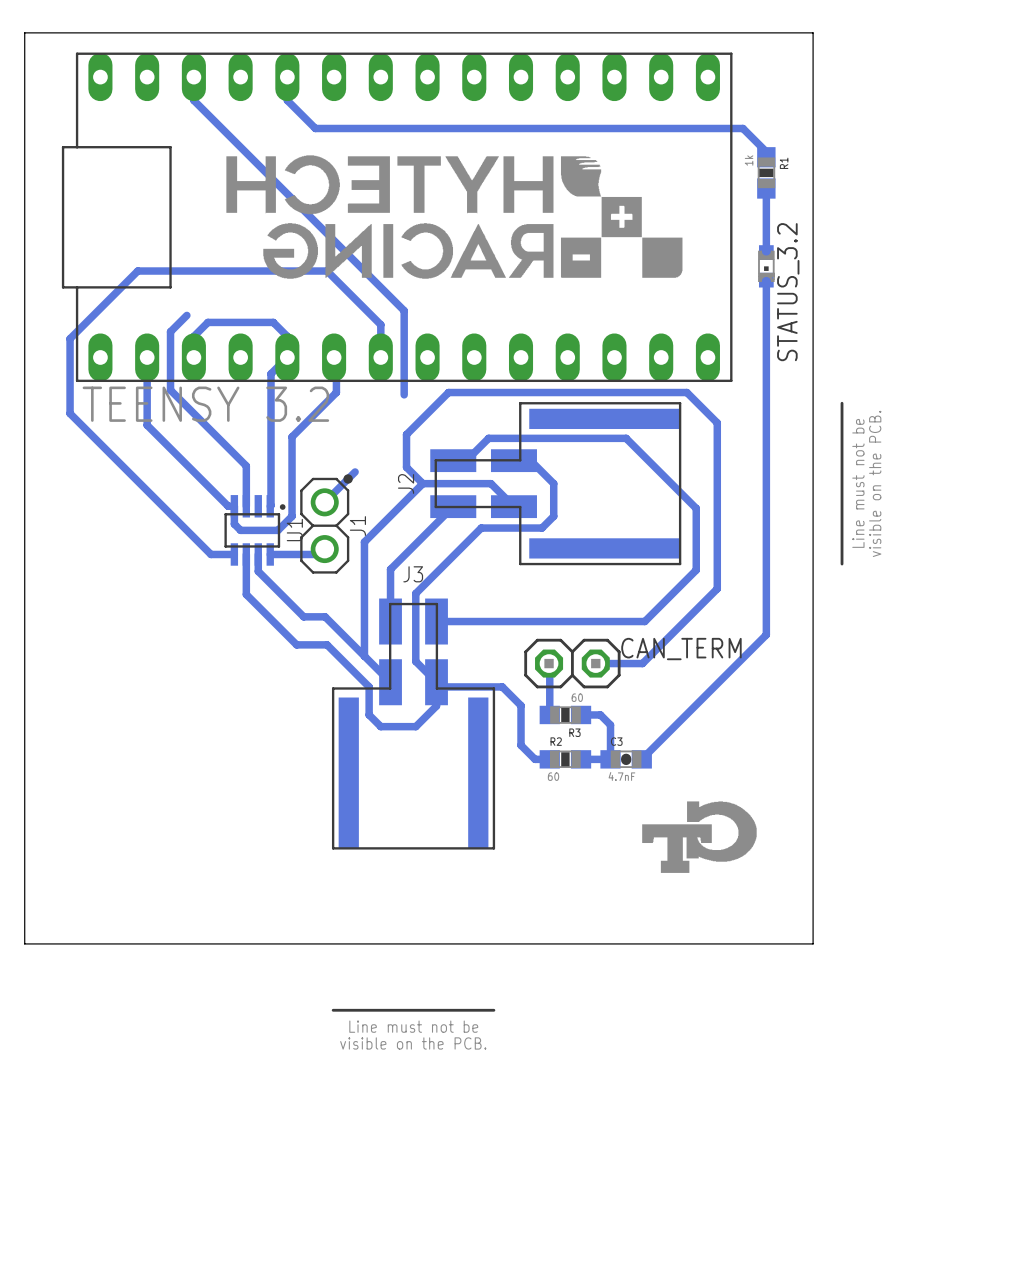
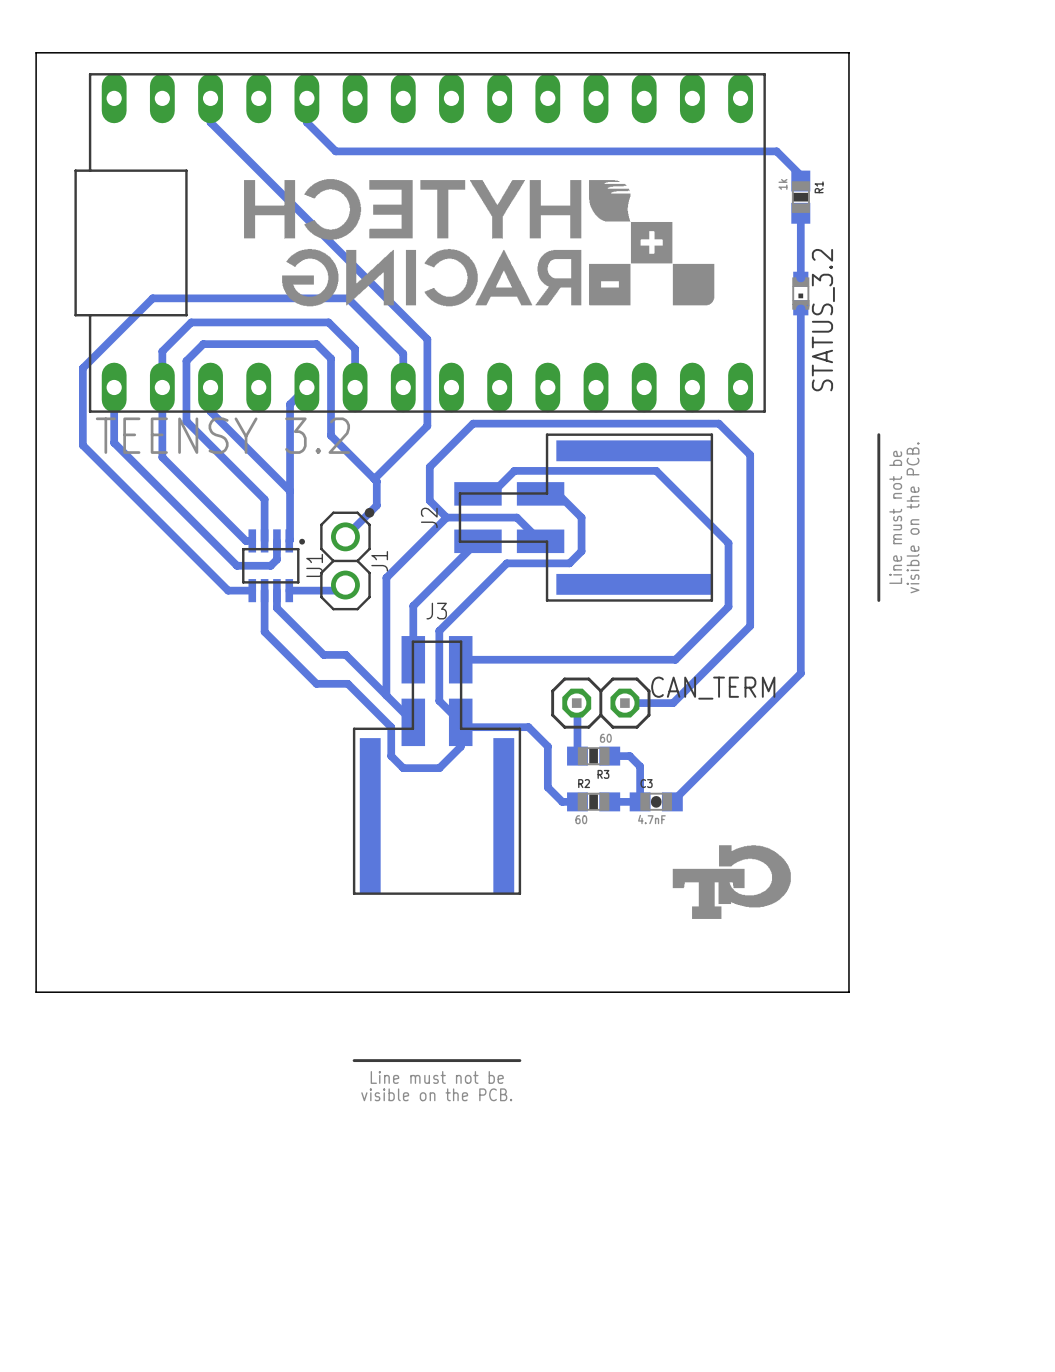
bottom track: none -> (203, 344) (316, 344) (331, 358) (331, 435) (376, 481) (376, 505)
bottom track: (287, 357) (287, 336) (273, 322) (207, 322) (193, 336) (193, 357) -> (290, 491) (210, 411) (210, 387)
bottom track: (334, 357) (336, 359) (336, 392) (292, 436) (292, 516) (278, 530) (252, 530) -> (276, 540) (276, 559) (270, 565)
bottom track: none -> (355, 387) (355, 348) (328, 322) (191, 322) (162, 351) (162, 387)
bottom track: none -> (427, 426) (374, 479)
bottom track: (234, 506) (234, 524) (240, 530) -> (114, 387) (114, 442) (237, 565) (258, 565)

